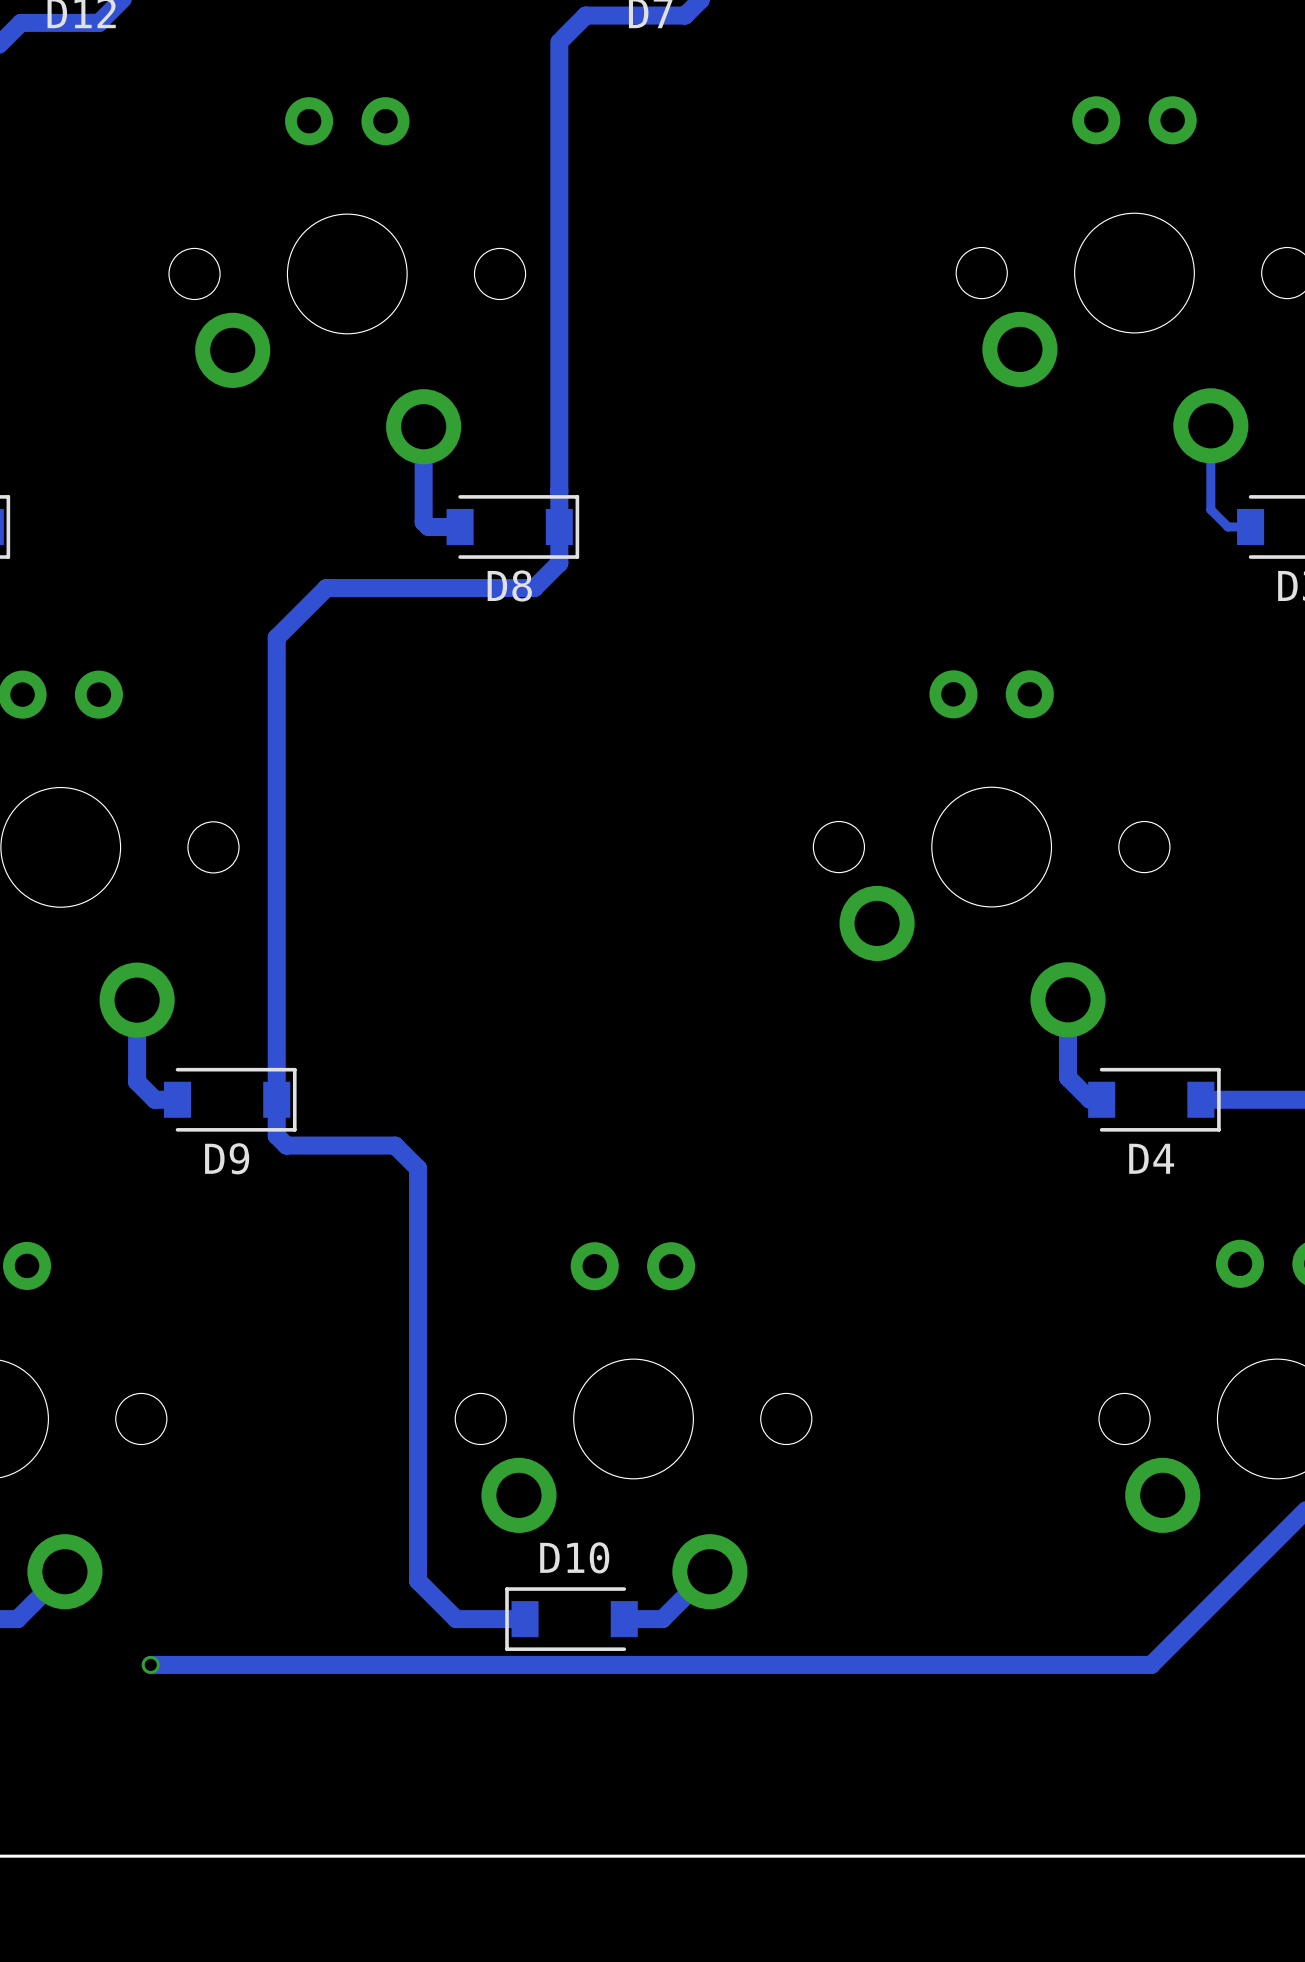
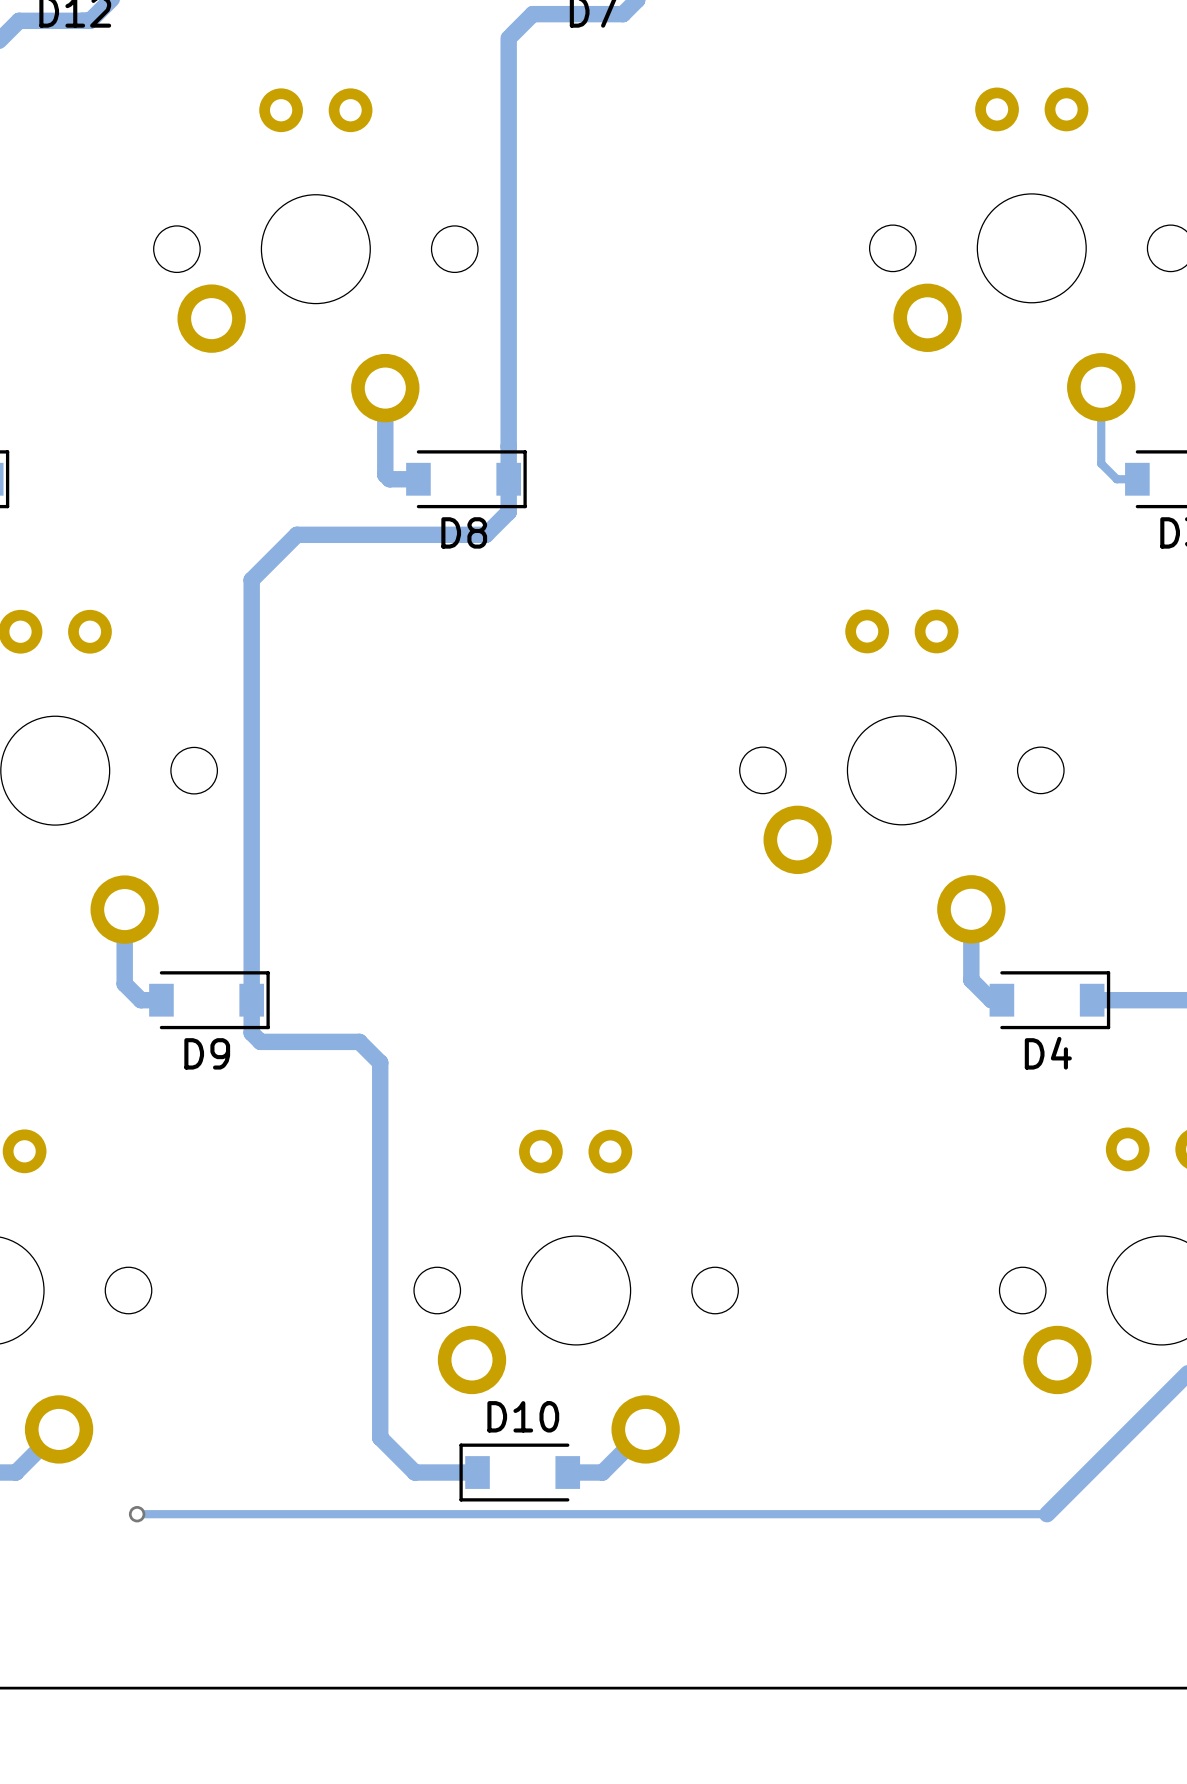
track width: thick (1151, 1664) (150, 1664) -> thin (1047, 1514) (137, 1514)

